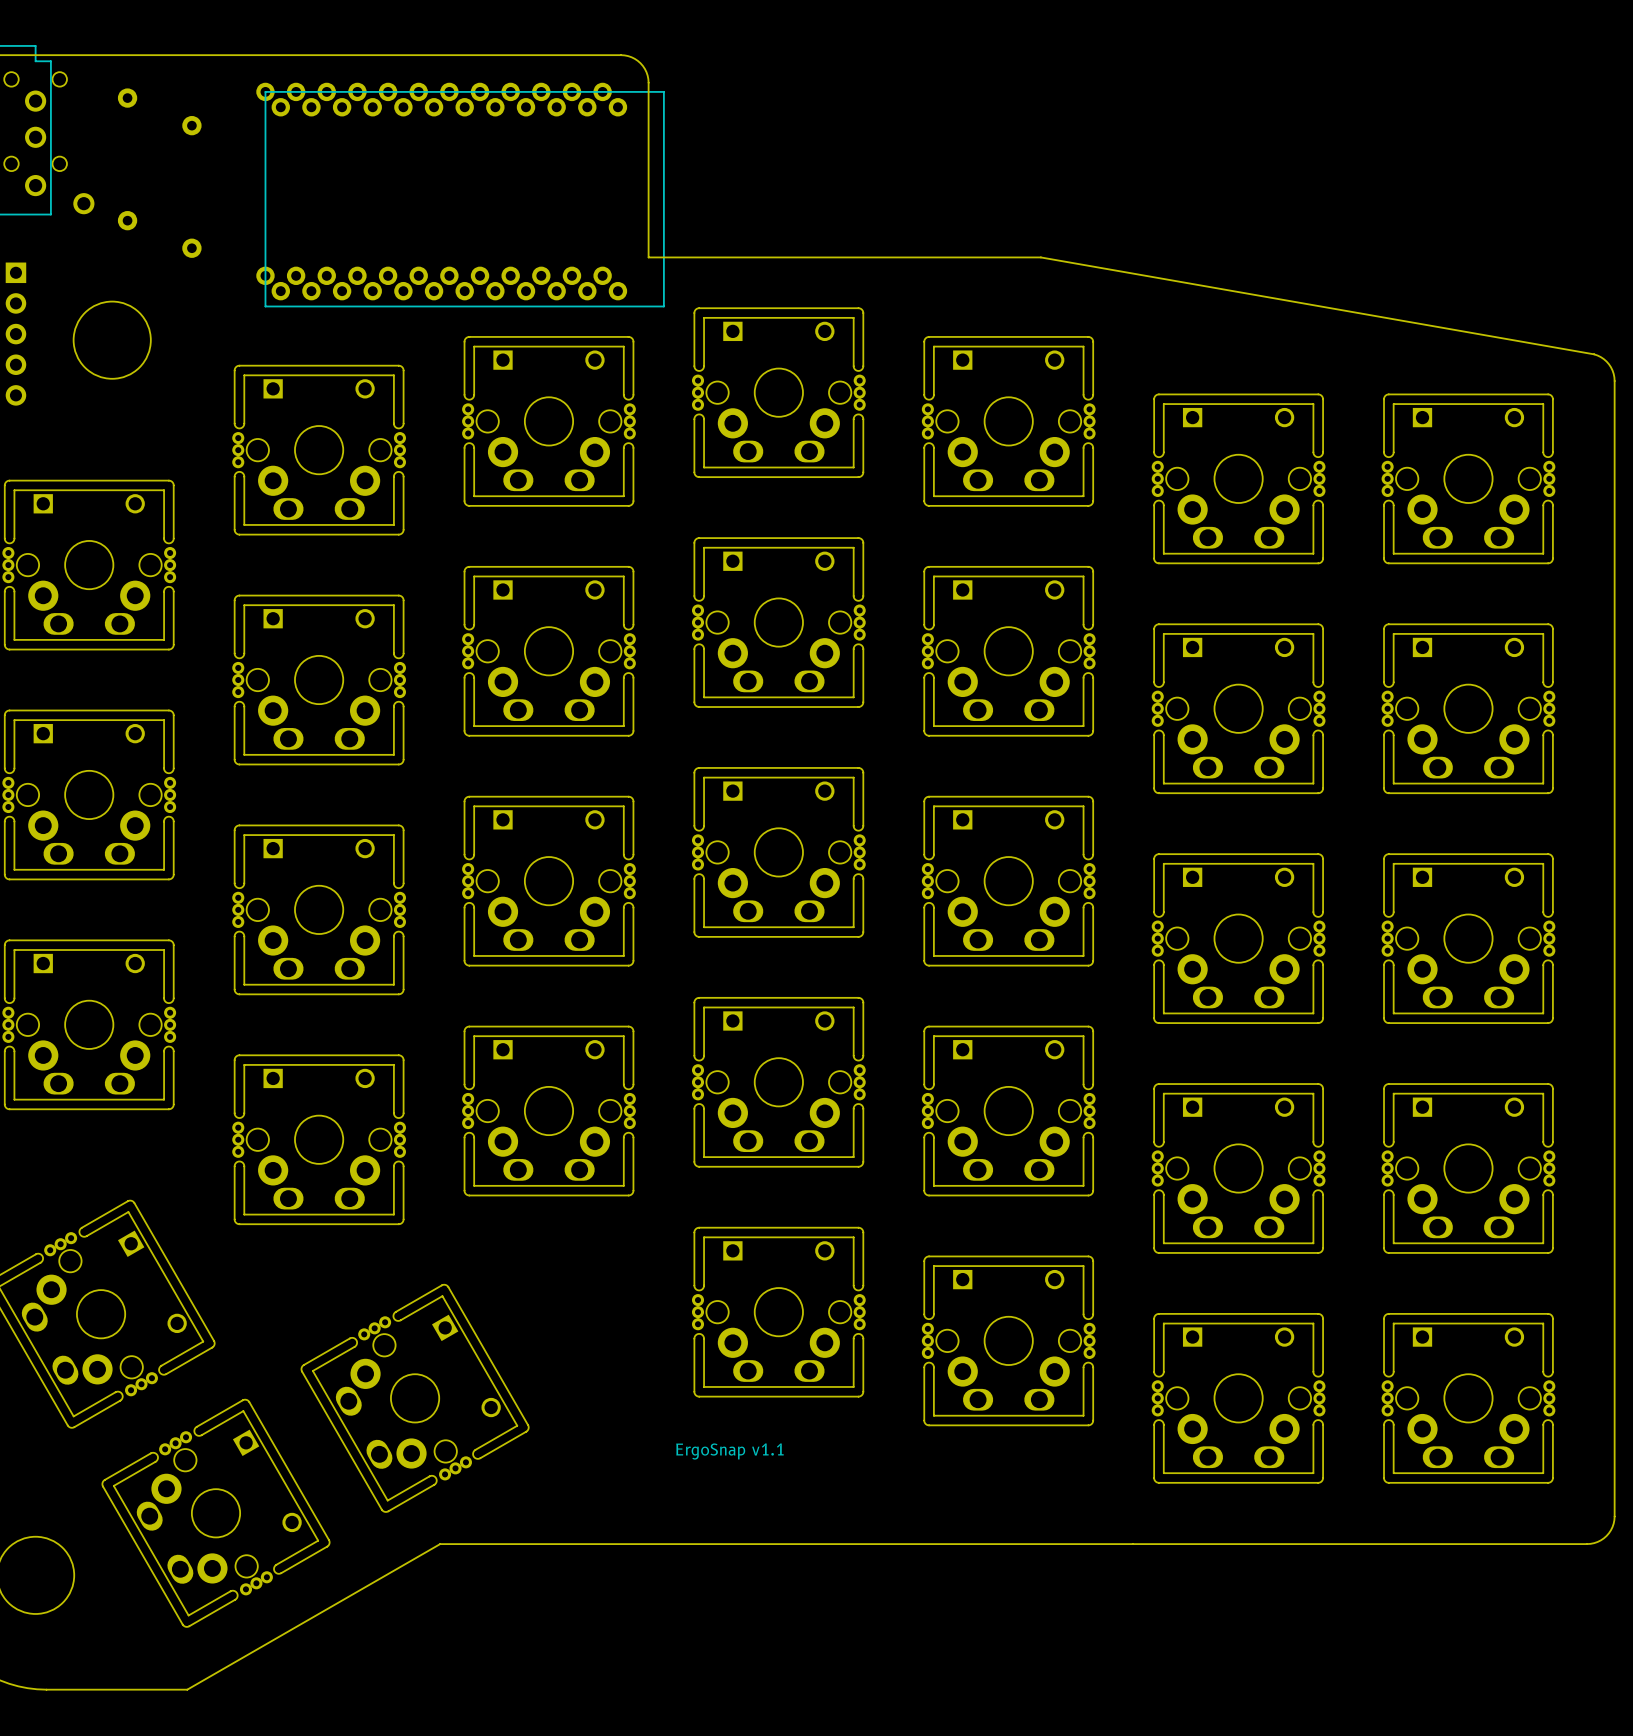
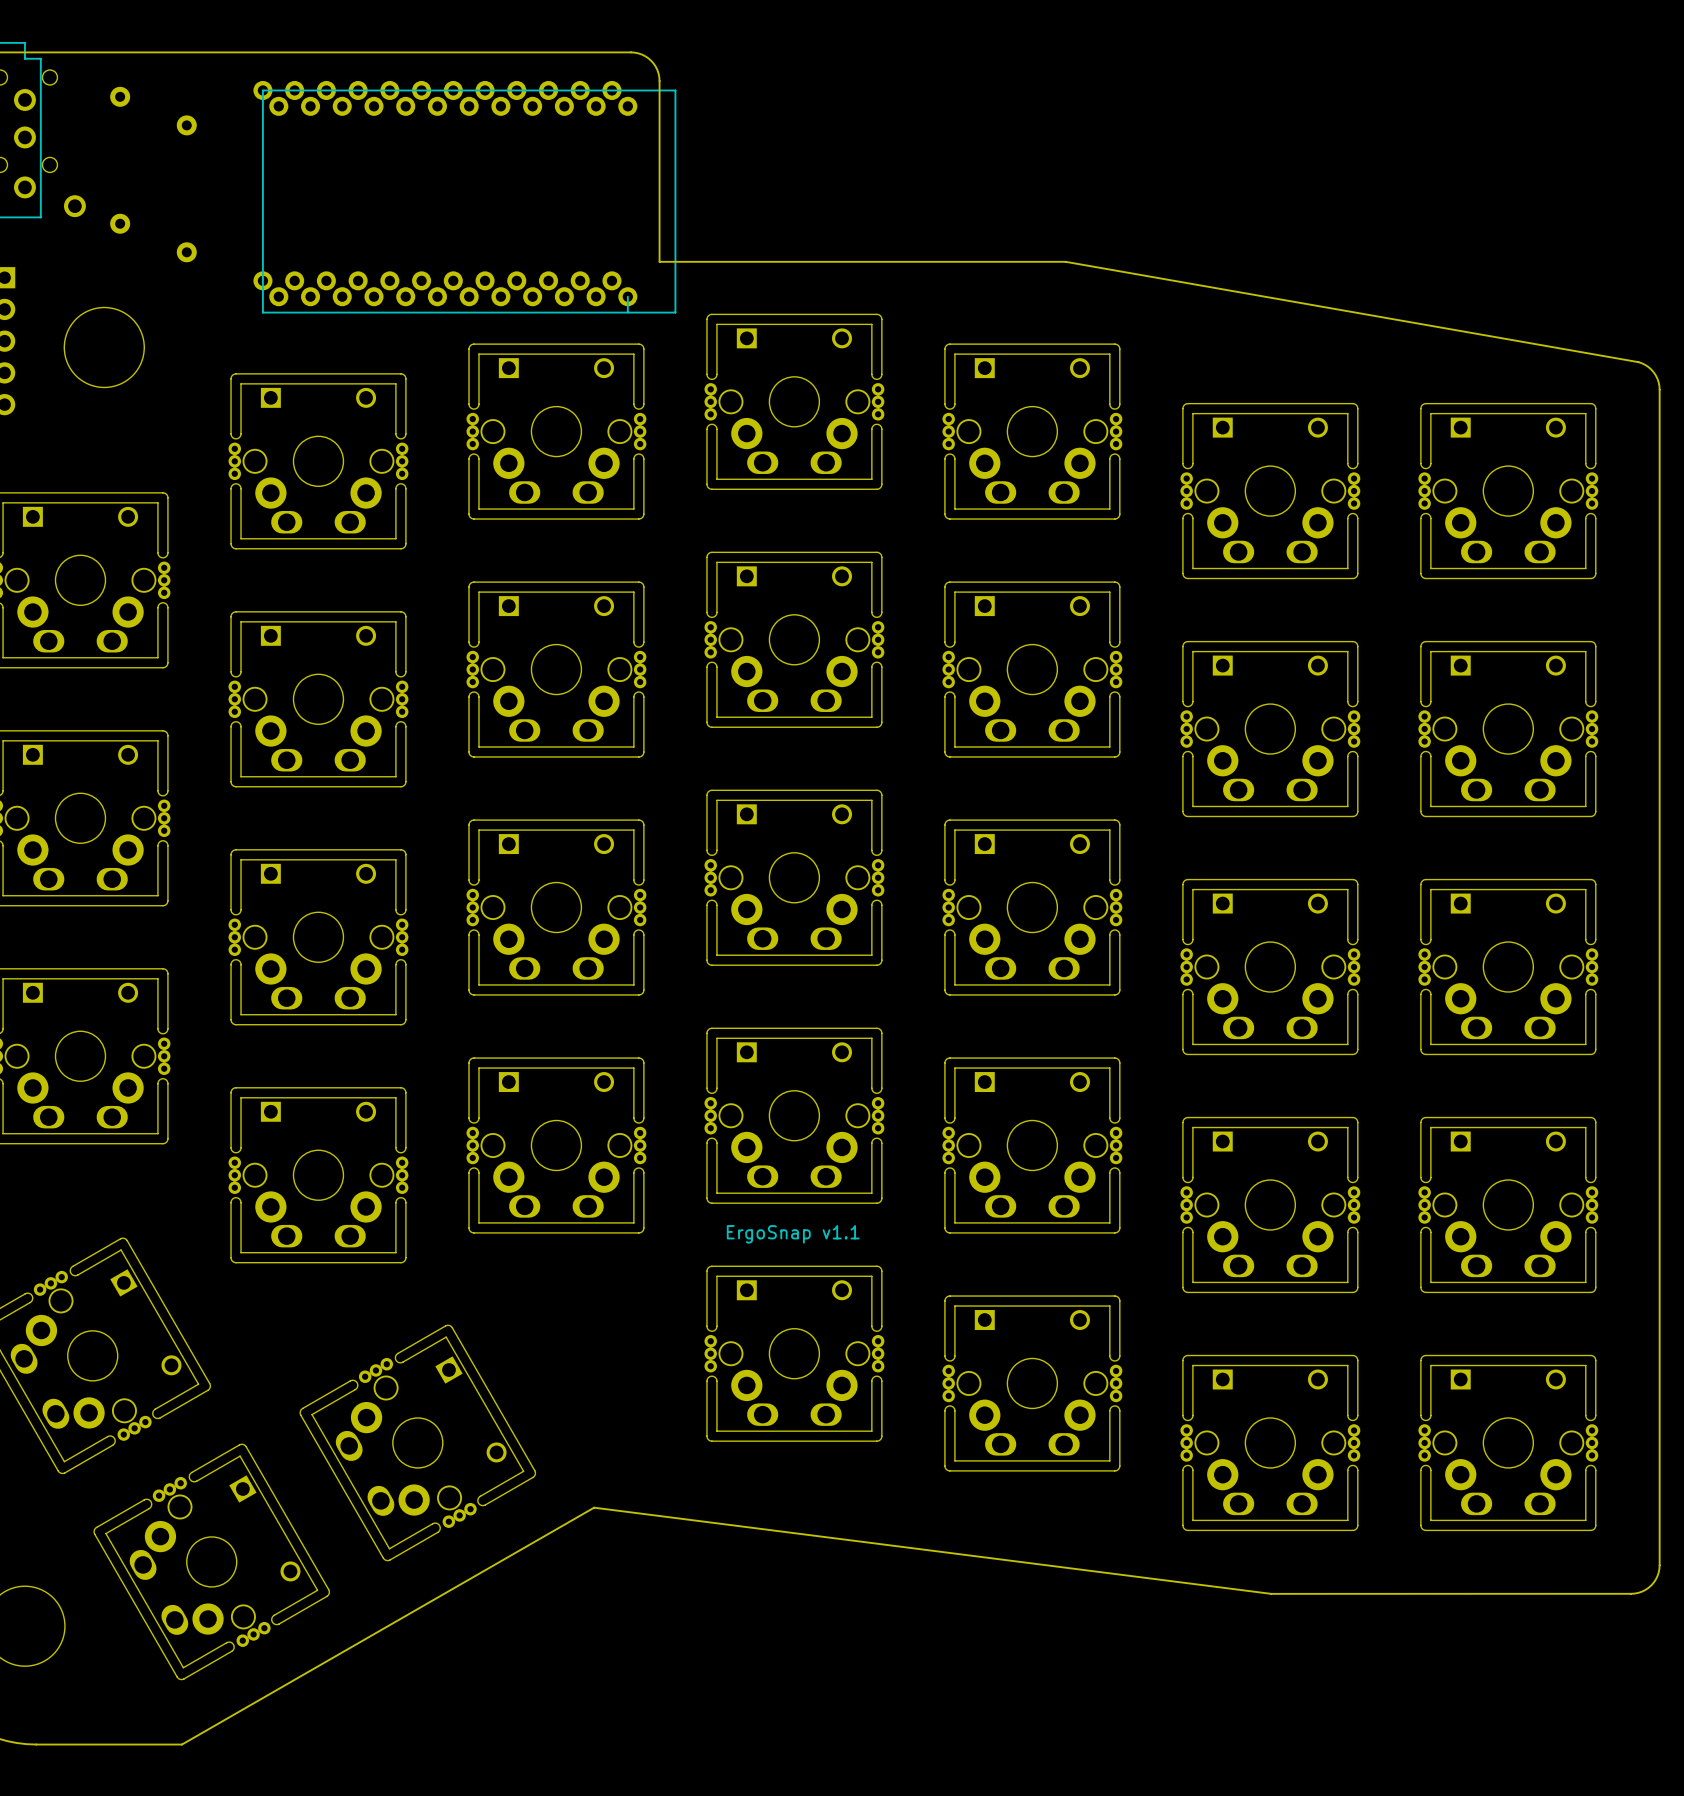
part footprint: [256, 82, 665, 308] -> [253, 80, 677, 314]
text position: ErgoSnap v1.1 (729, 1451) -> ErgoSnap v1.1 (793, 1234)
board edge: (1587, 1544) (440, 1544) (187, 1689) -> (1631, 1593) (1271, 1593) (594, 1507) (182, 1744)

